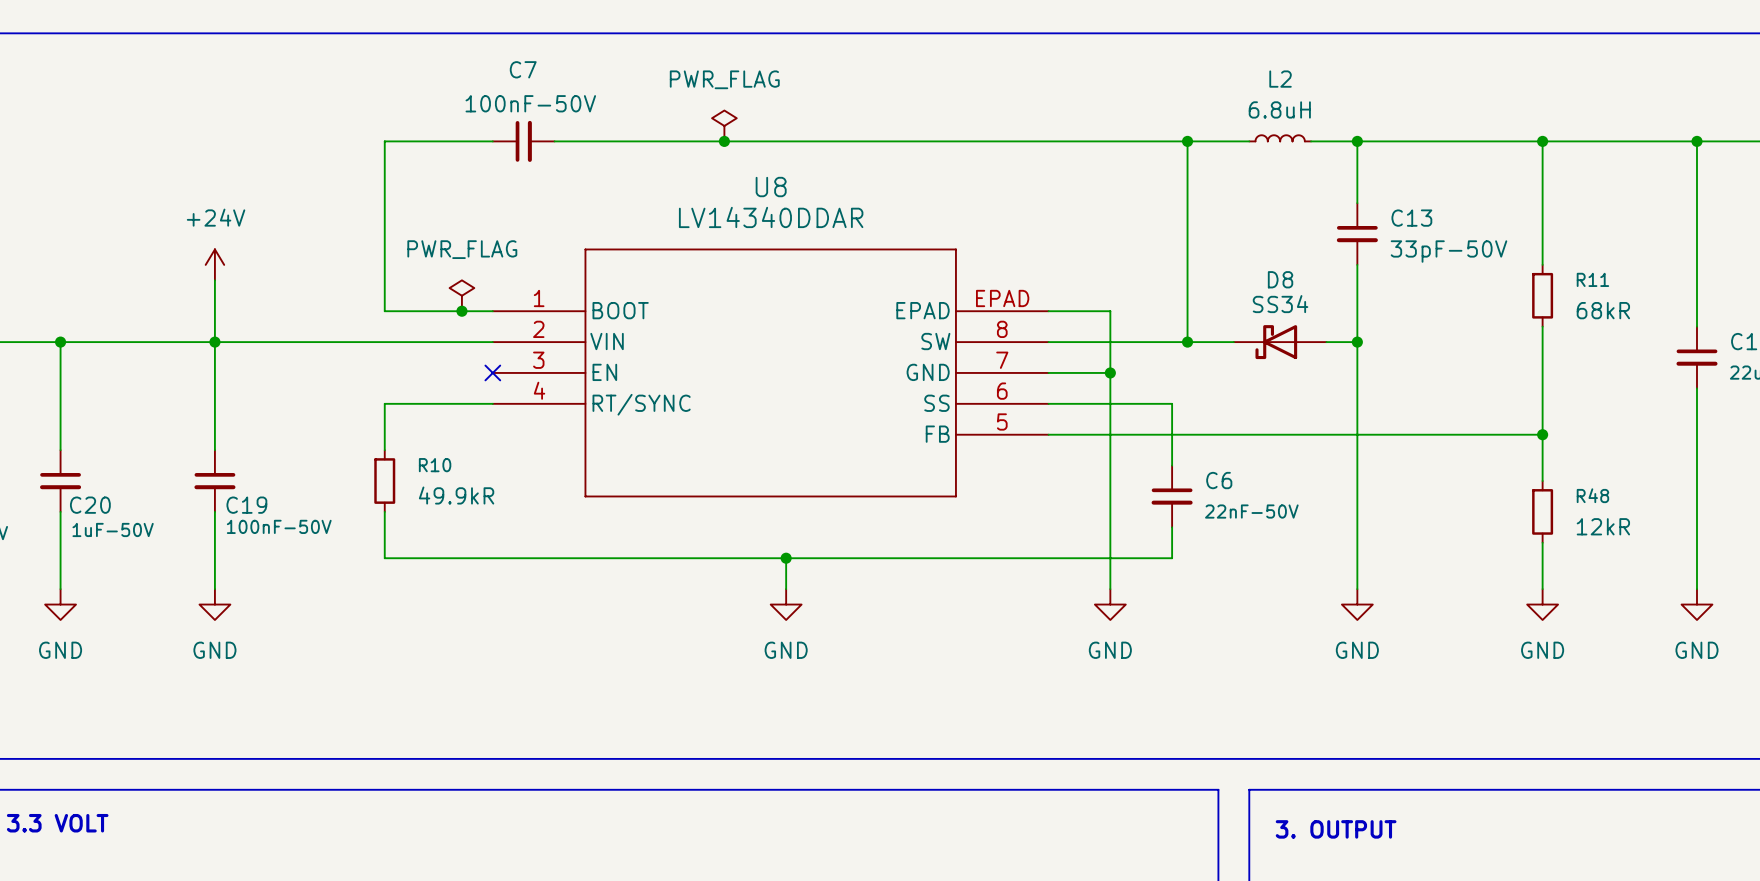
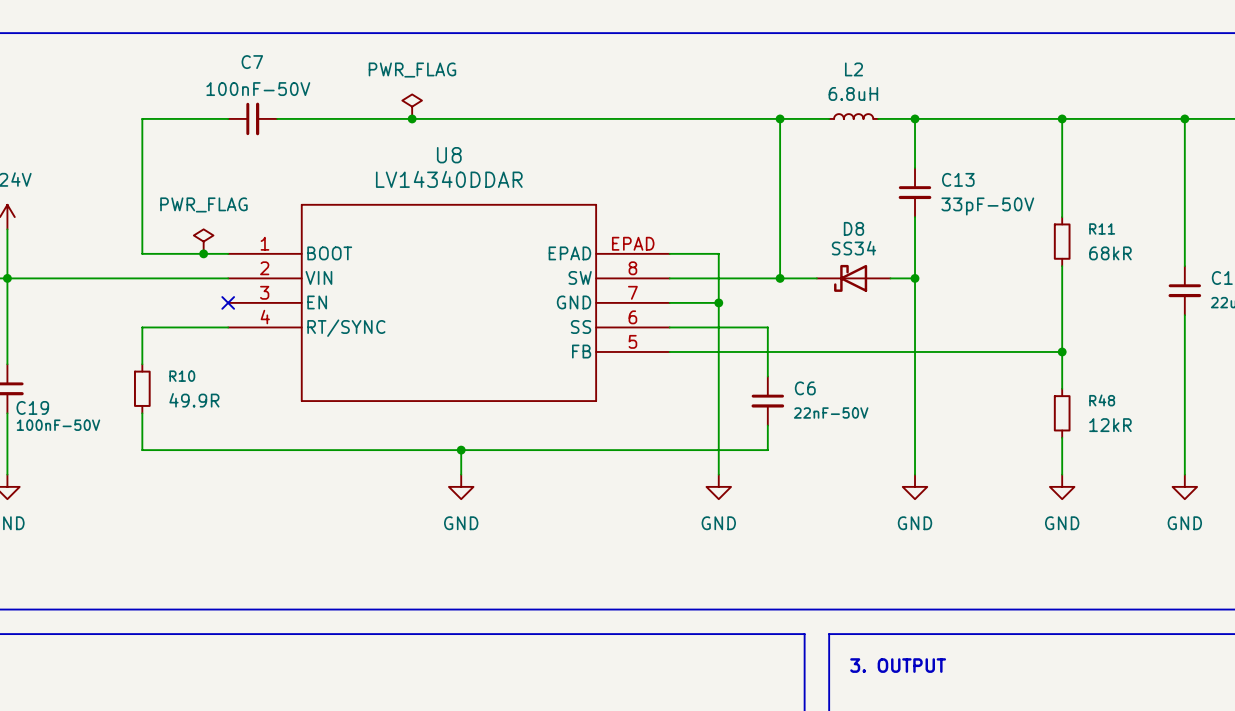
R10 value: 49.9kR (456, 495) -> 49.9R (194, 400)

